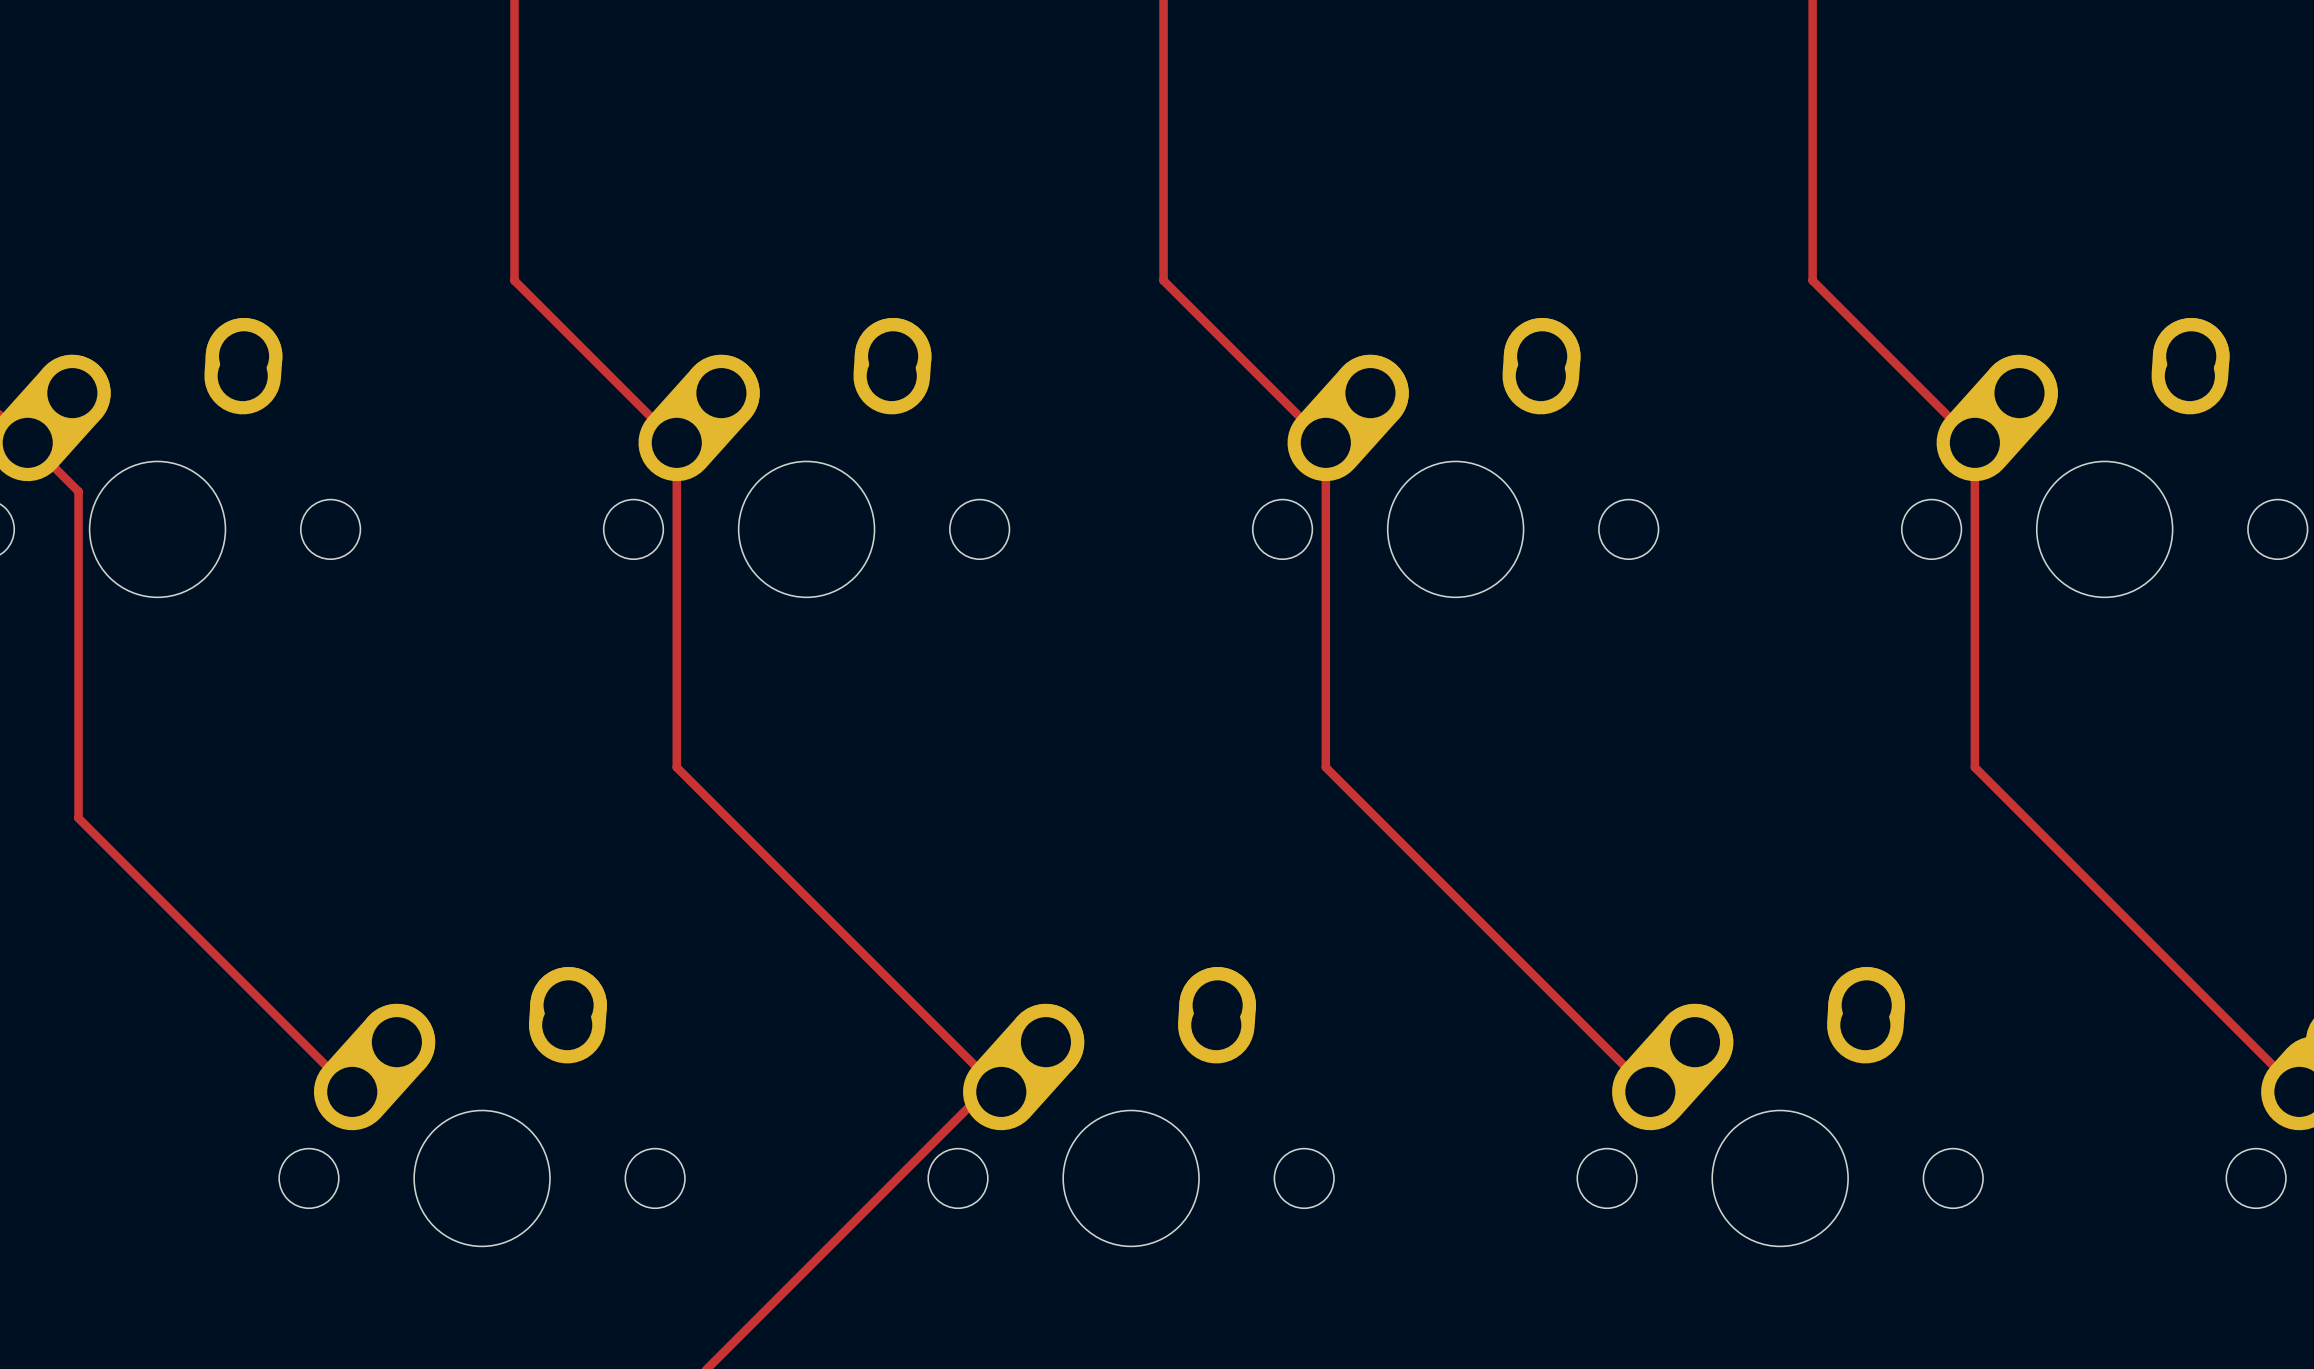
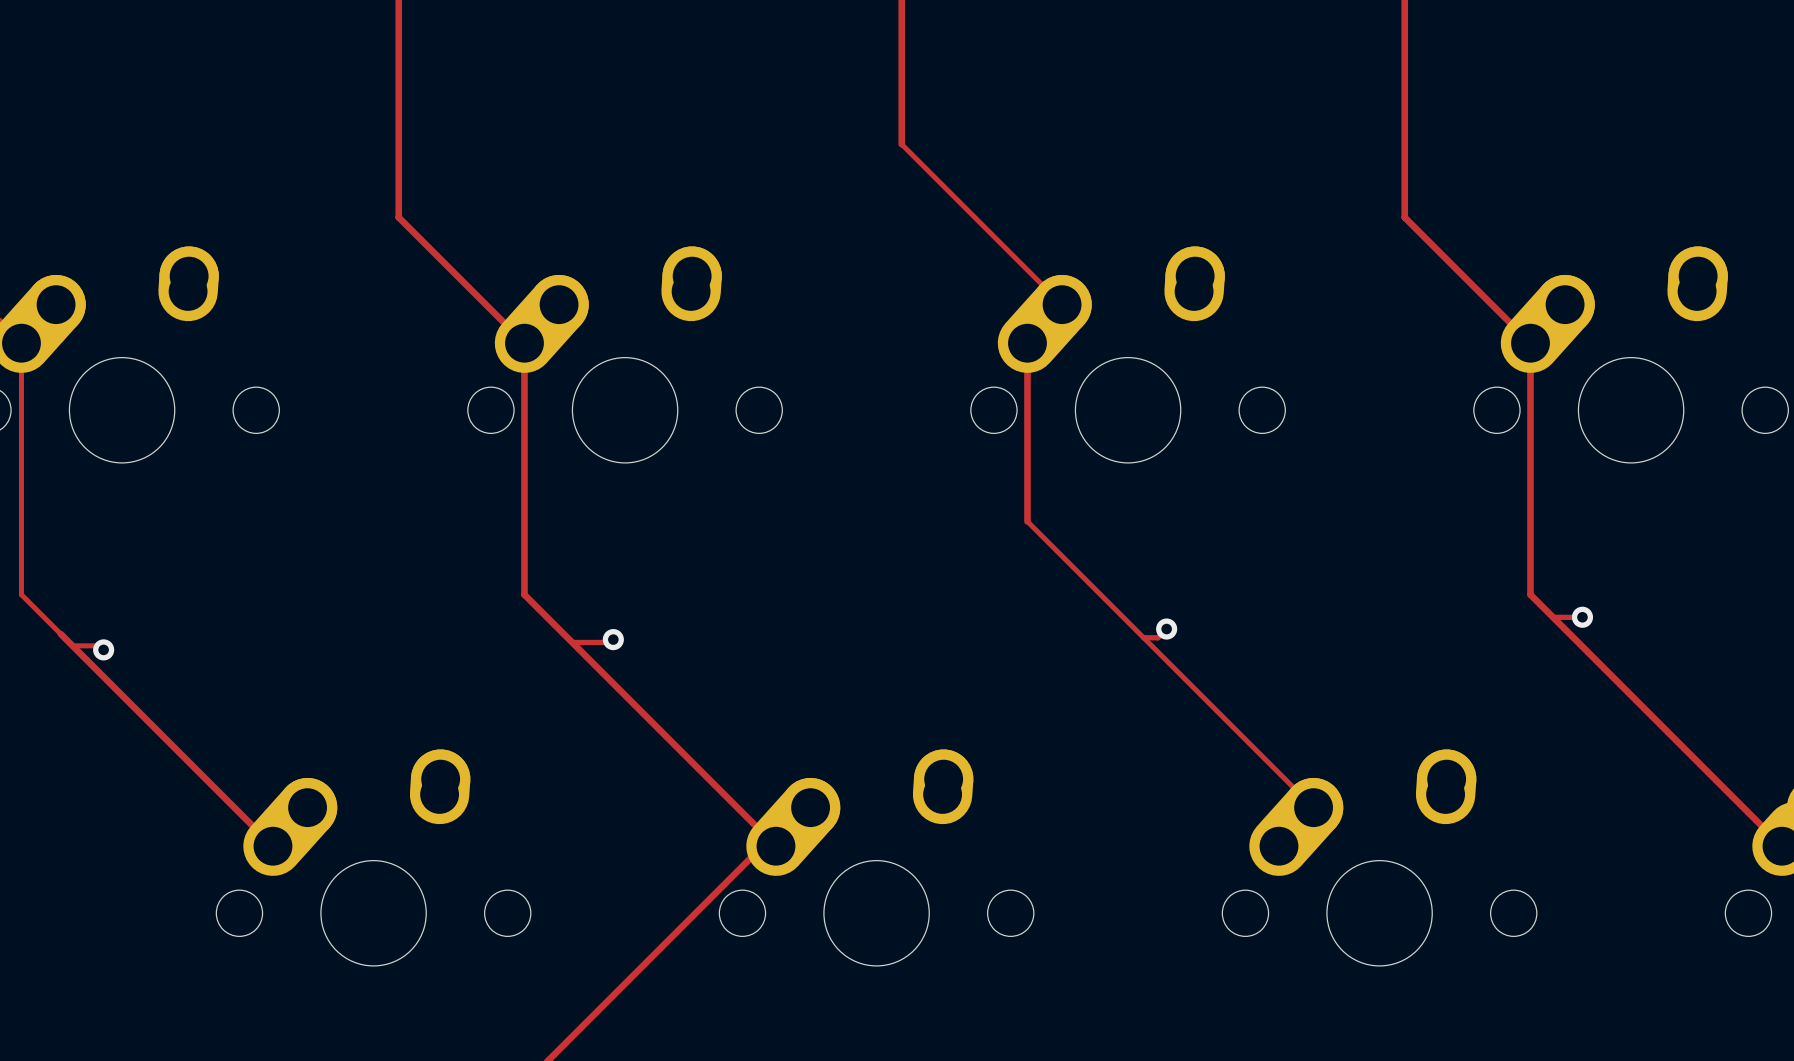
track: (1163, 186) (1163, 280) (1325, 442) -> (901, 144) (1062, 304)
track: (27, 442) (78, 491) (78, 818) -> (21, 343) (21, 594) (60, 634)
track: (1325, 673) (1325, 767) (1650, 1091) -> (1027, 521) (1313, 807)
track: none -> (1553, 617) (1582, 617)
via: none -> (1582, 617)
track: none -> (1166, 629) (1157, 637) (1143, 637)
via: none -> (1166, 629)
track: none -> (613, 639) (610, 642) (572, 642)
via: none -> (613, 639)
track: none -> (72, 645) (99, 645) (103, 649)
via: none -> (103, 649)

